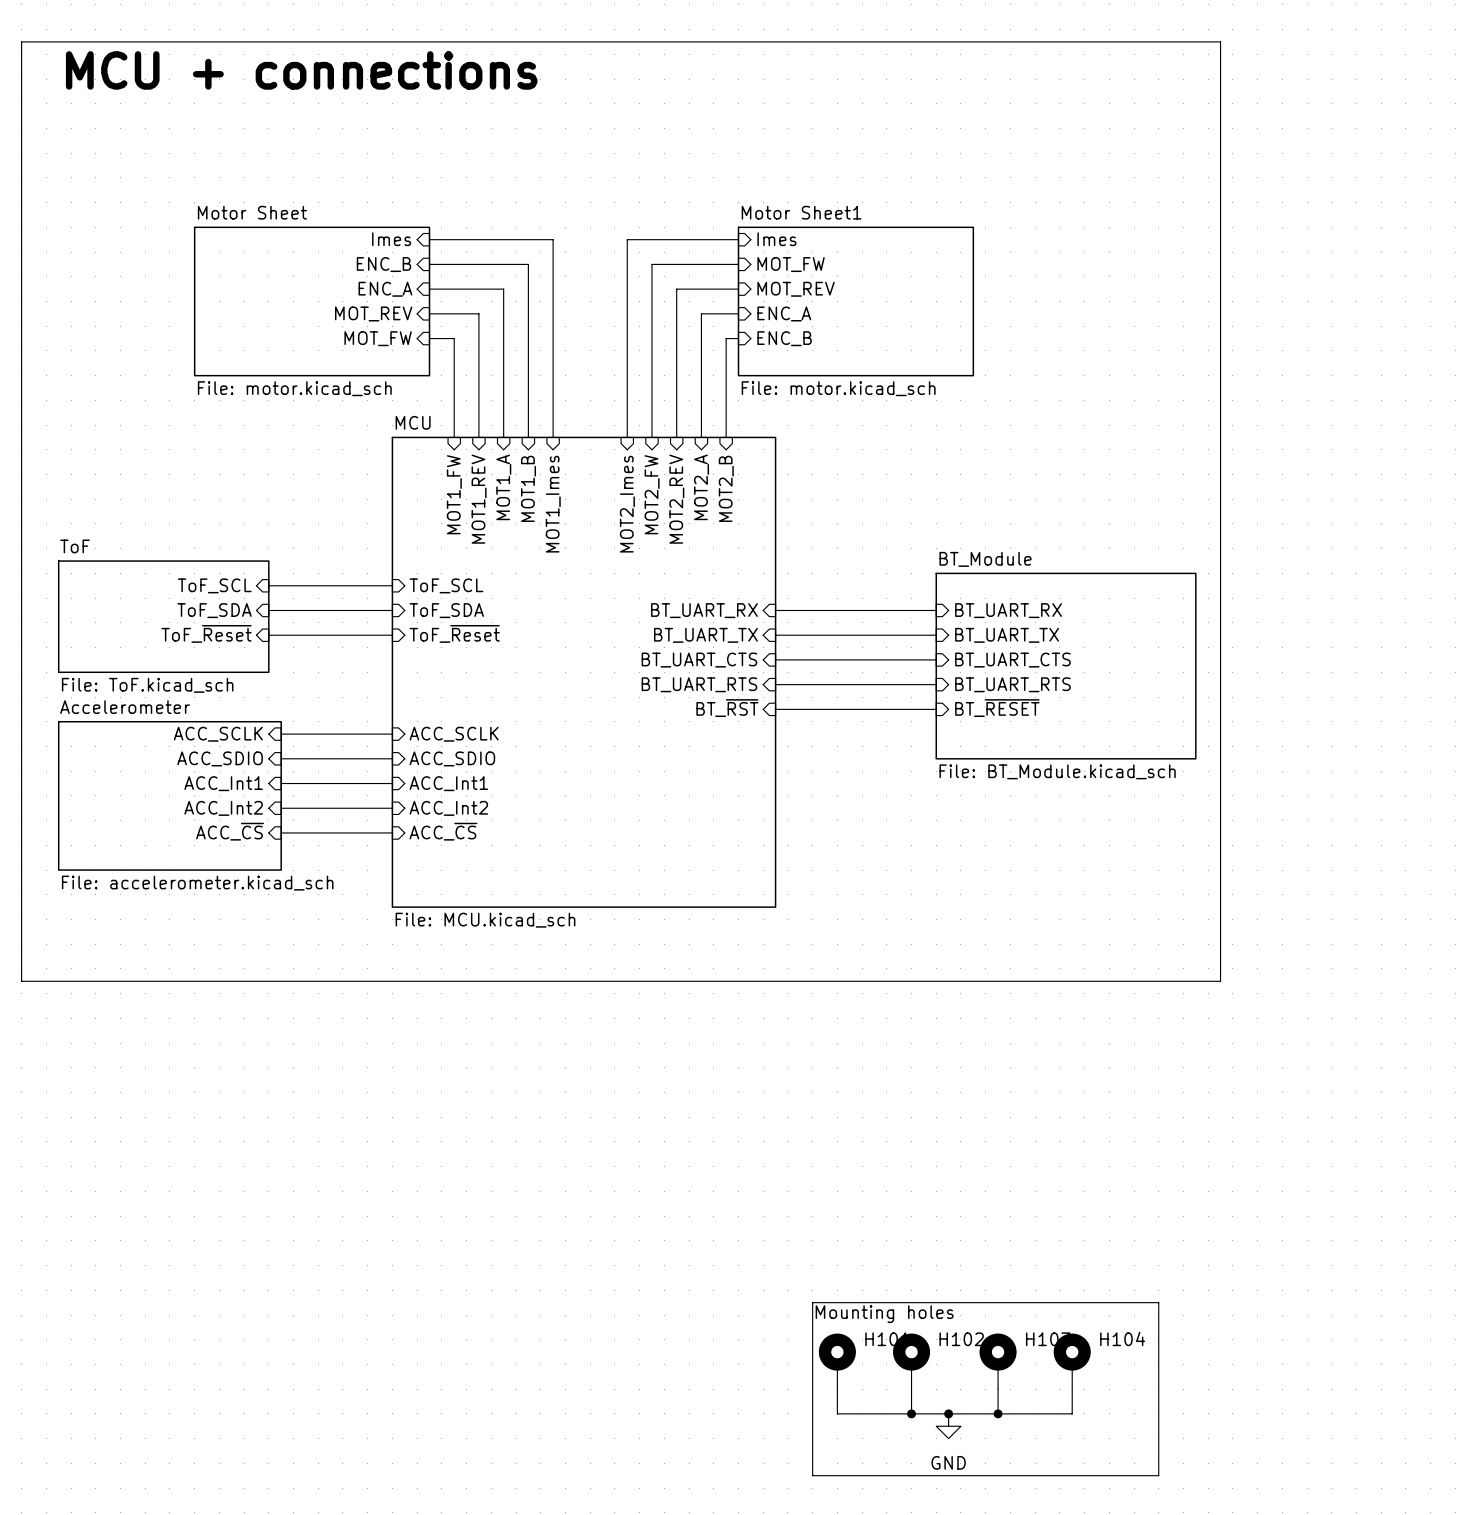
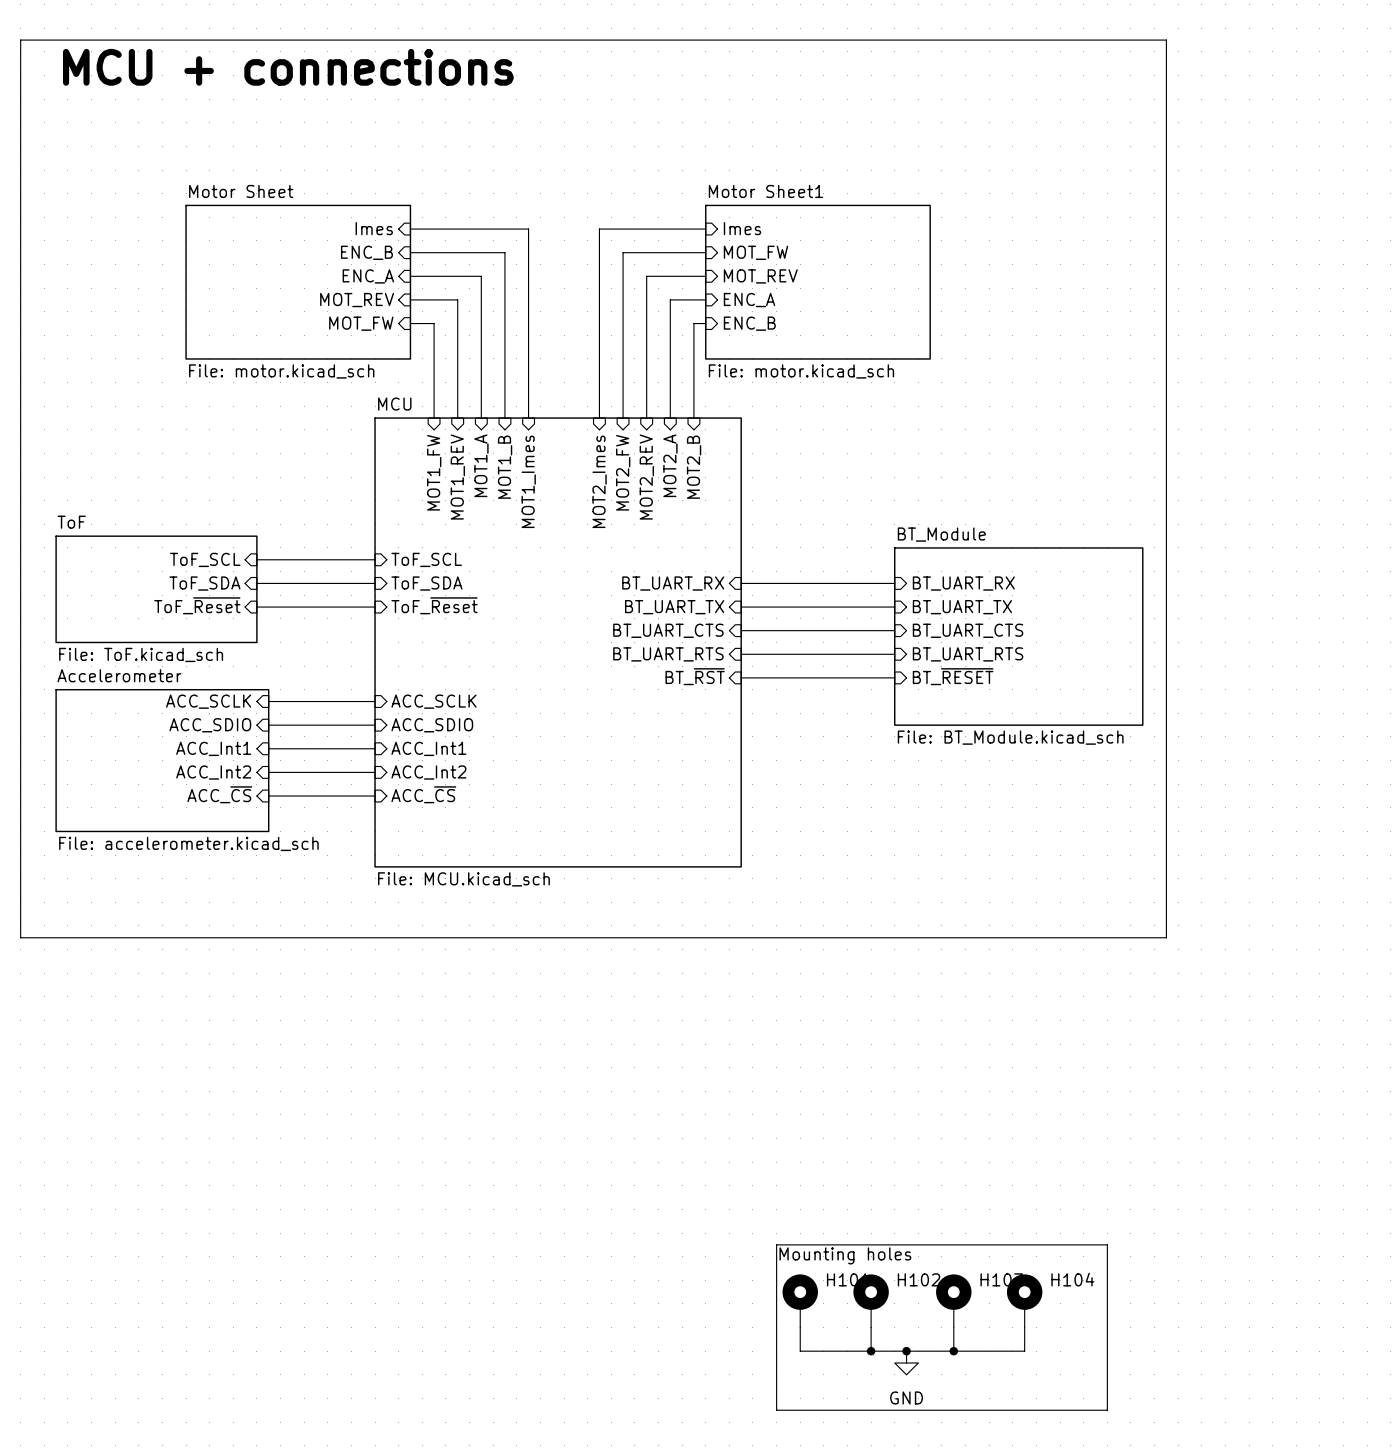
sheet Motor Sheet shape: [193, 226, 431, 377] -> [185, 204, 412, 360]
sheet Motor Sheet1 shape: [737, 226, 975, 377] -> [705, 204, 931, 360]

